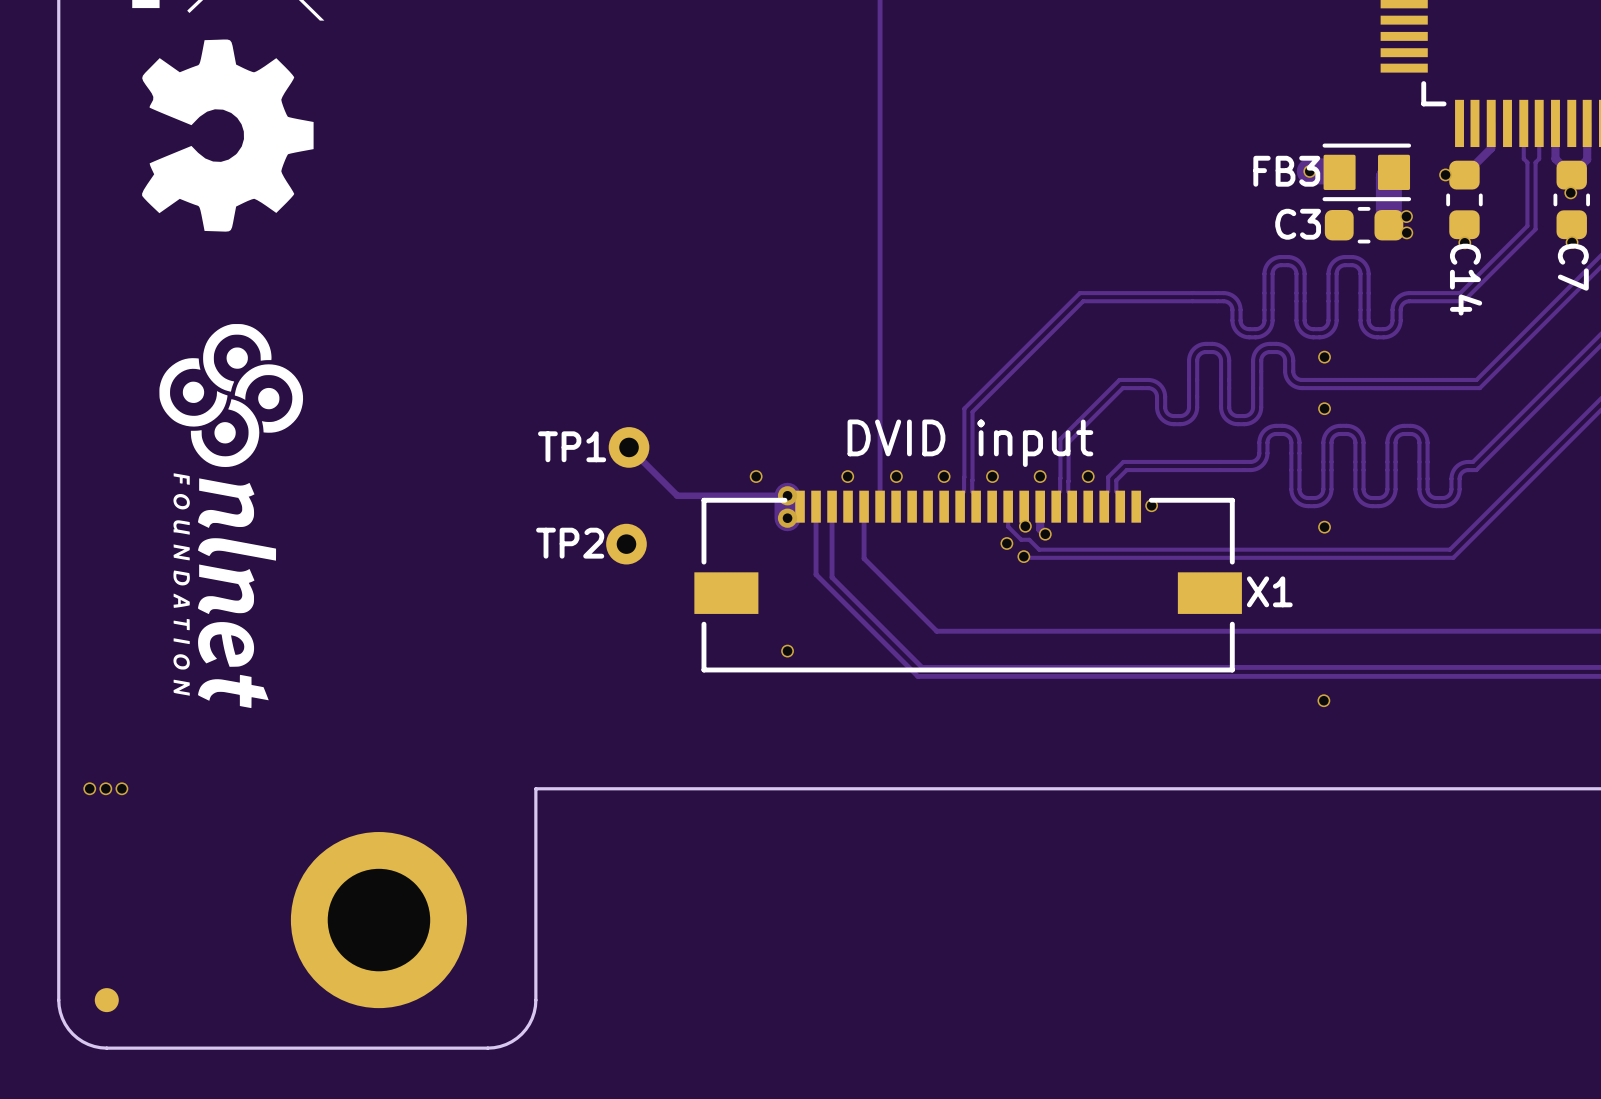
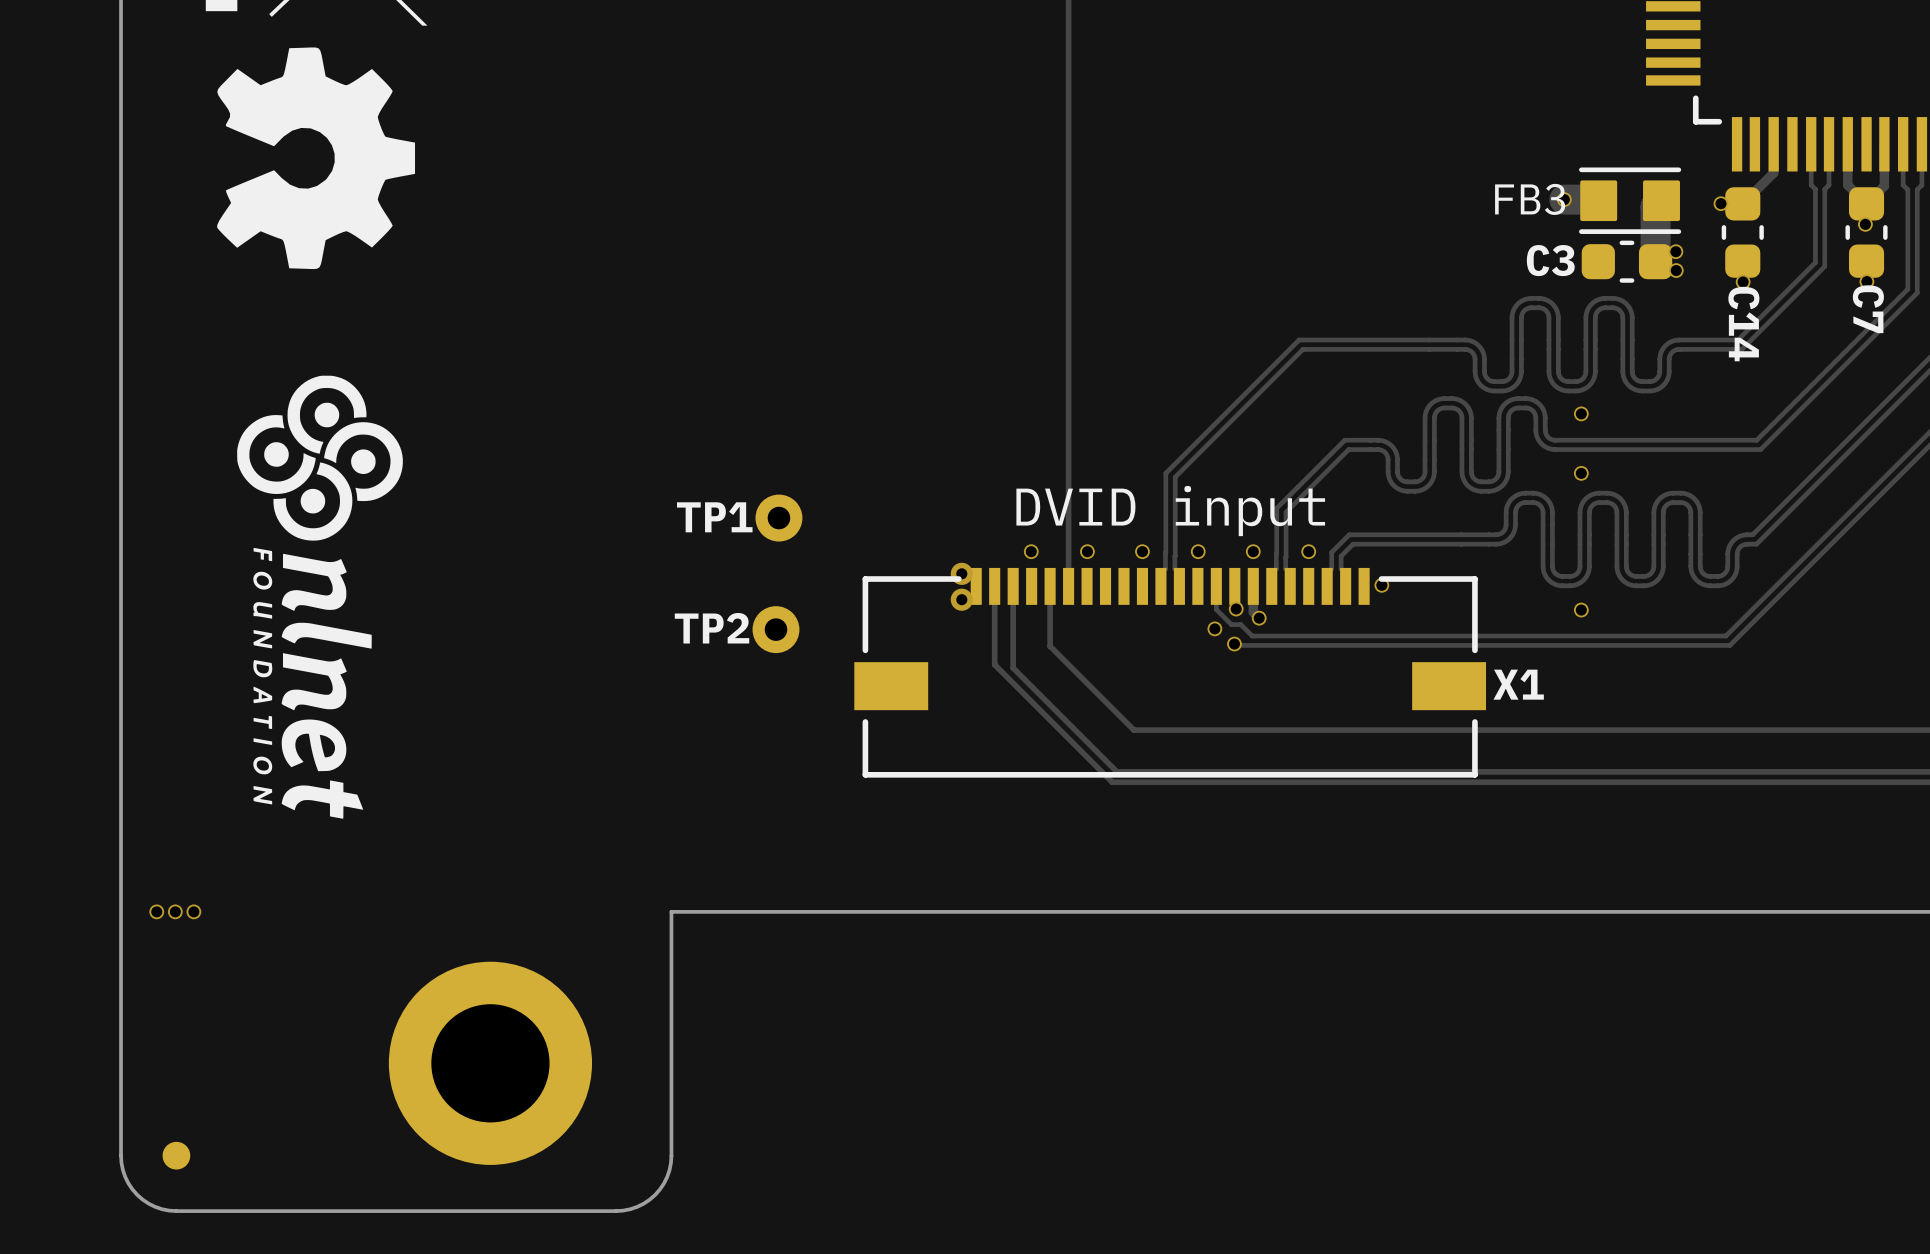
track: (629, 447) (677, 495) (787, 495) (787, 518) -> none
via: (756, 476) -> none
via: (787, 651) -> none
via: (1323, 700) -> none

